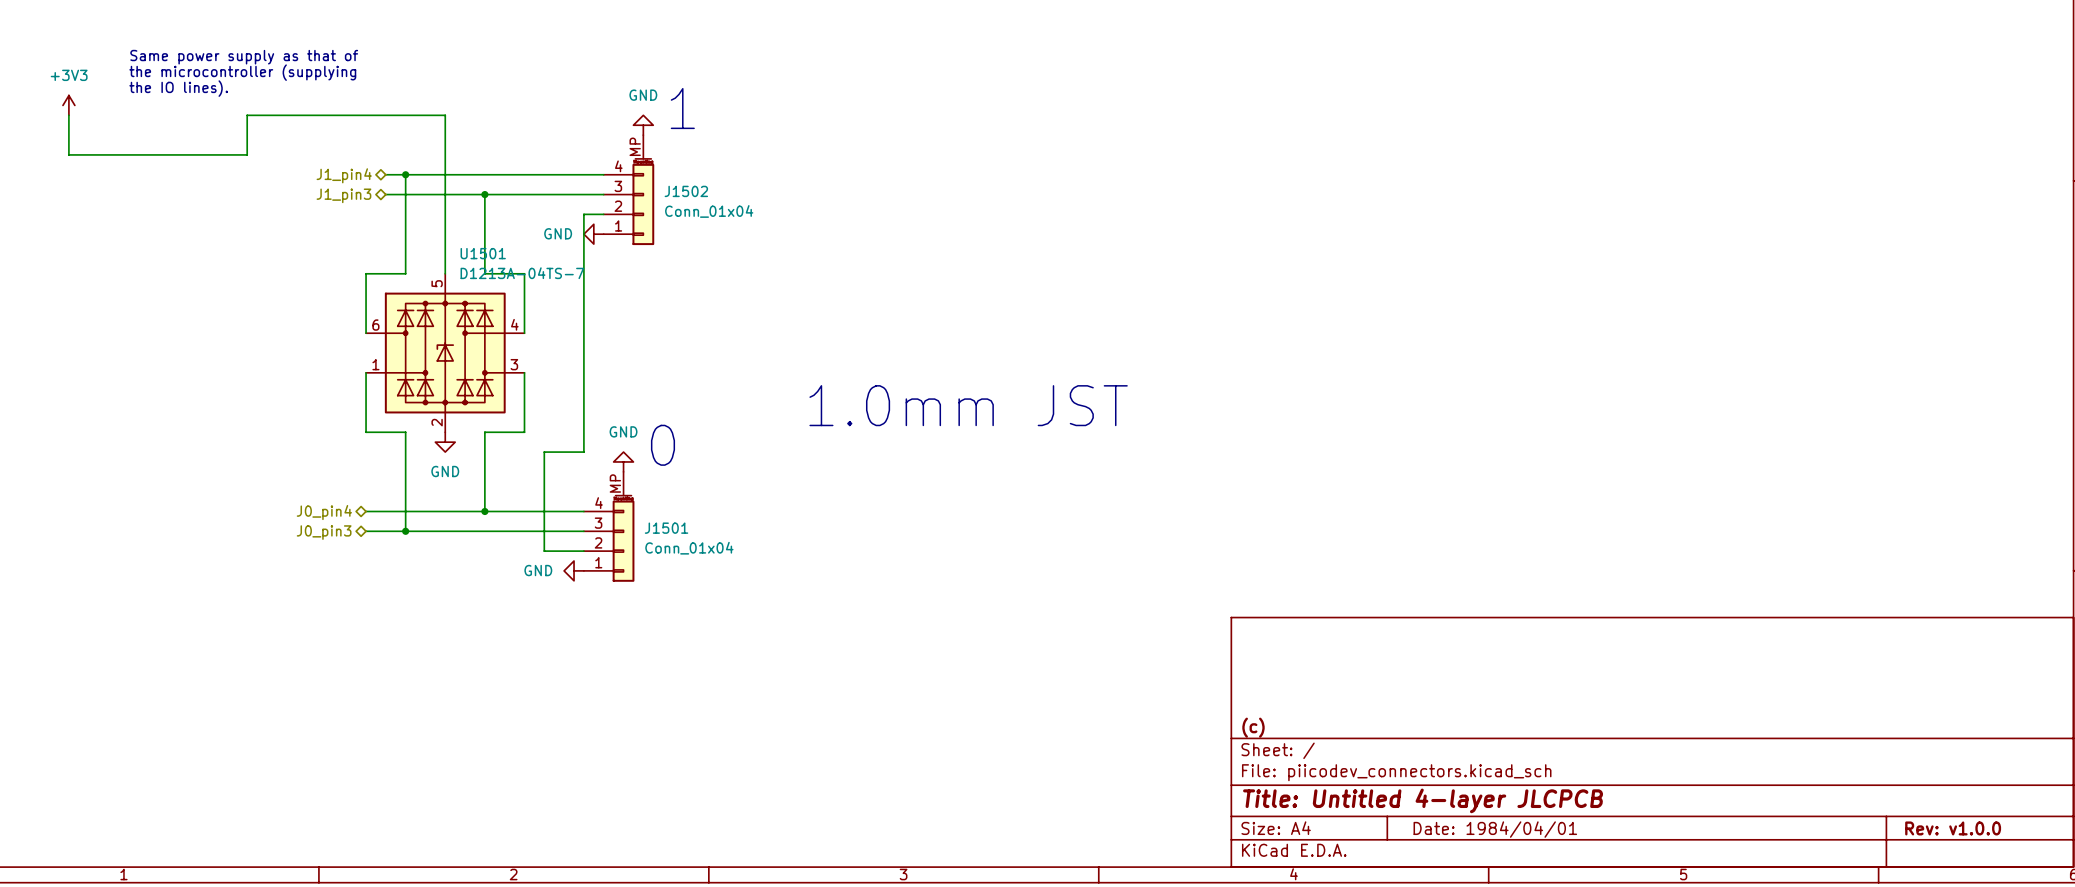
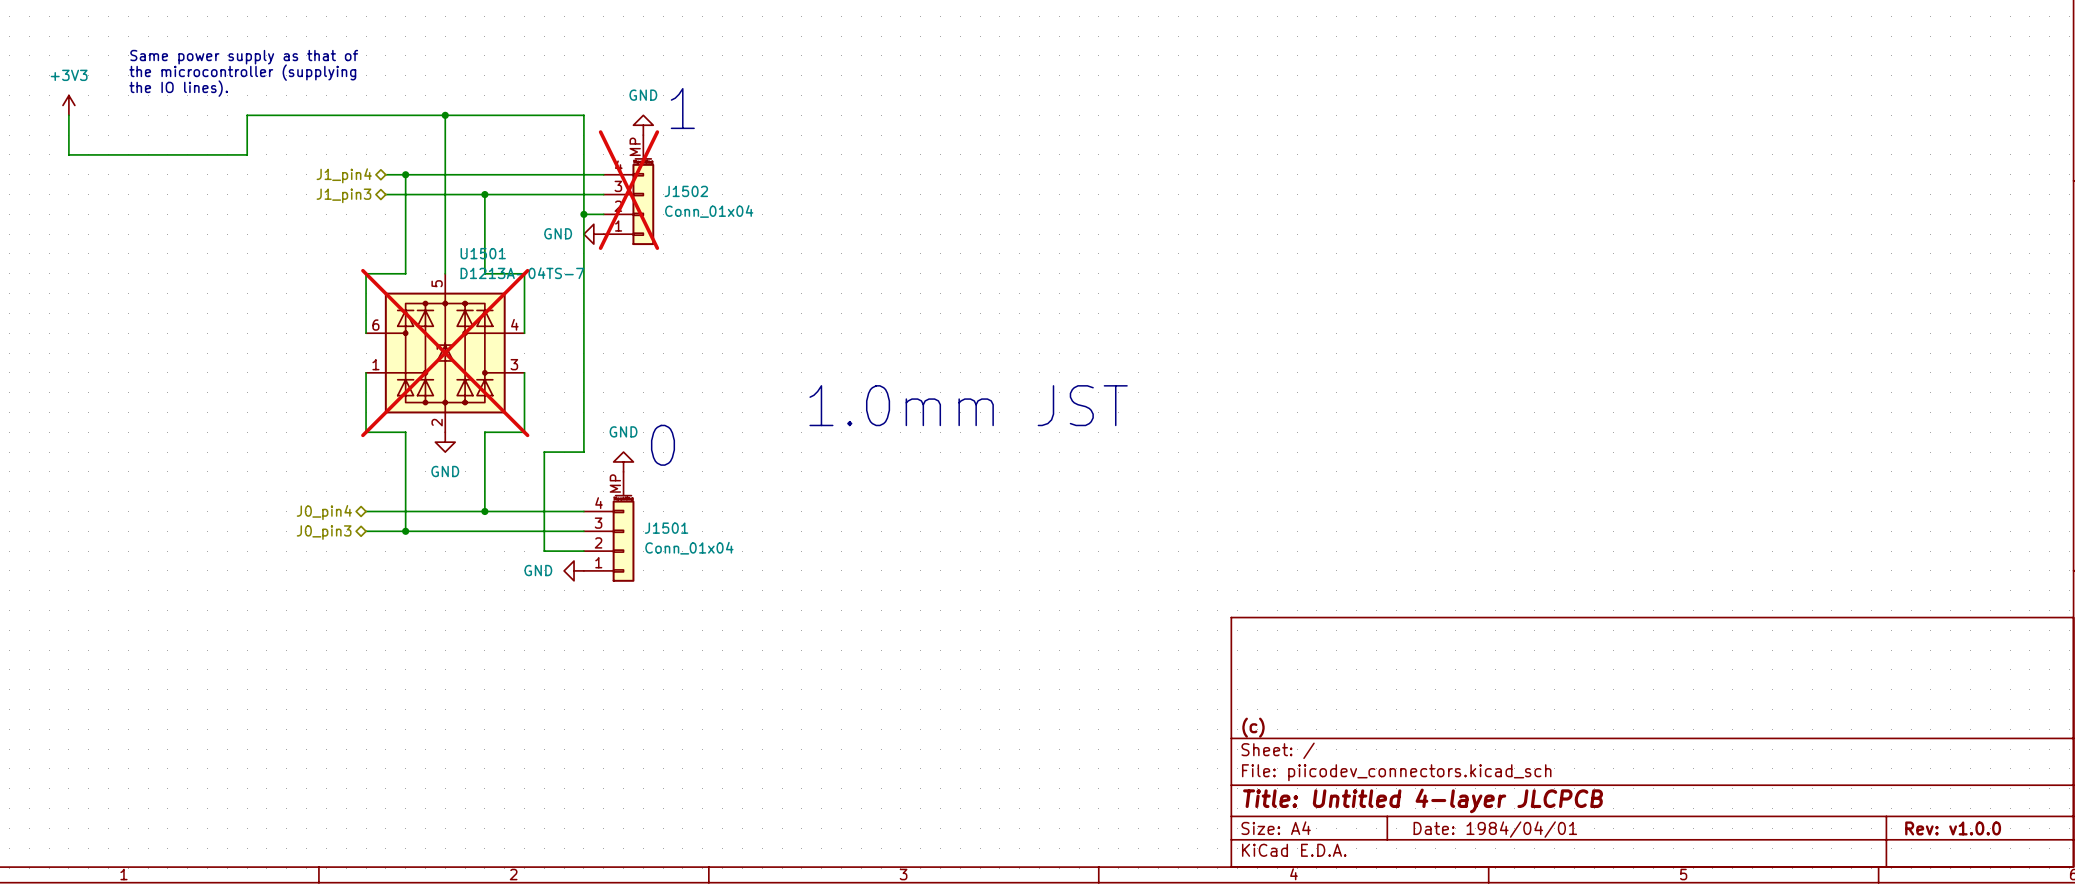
wire: none -> (445, 115) (583, 115) (583, 214)
junction: none -> (445, 115)
J1502 do-not-place cross: none -> (628, 190)
junction: none -> (583, 214)
U1501 do-not-place cross: none -> (445, 353)

